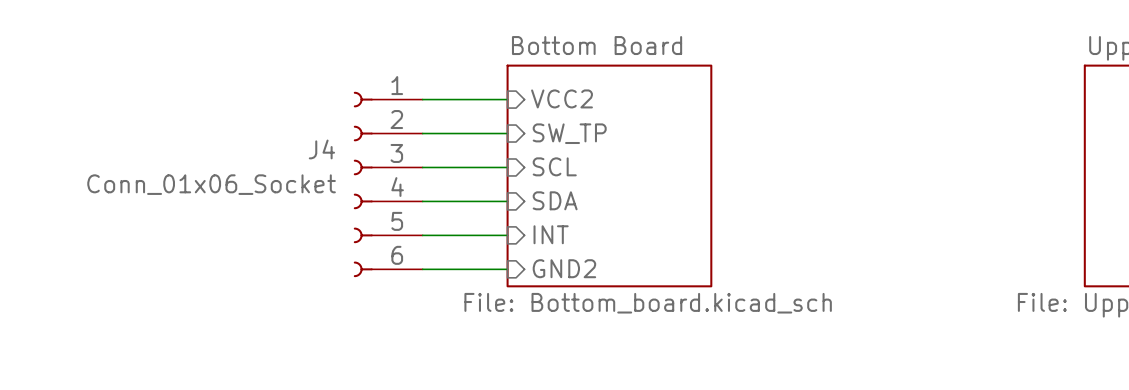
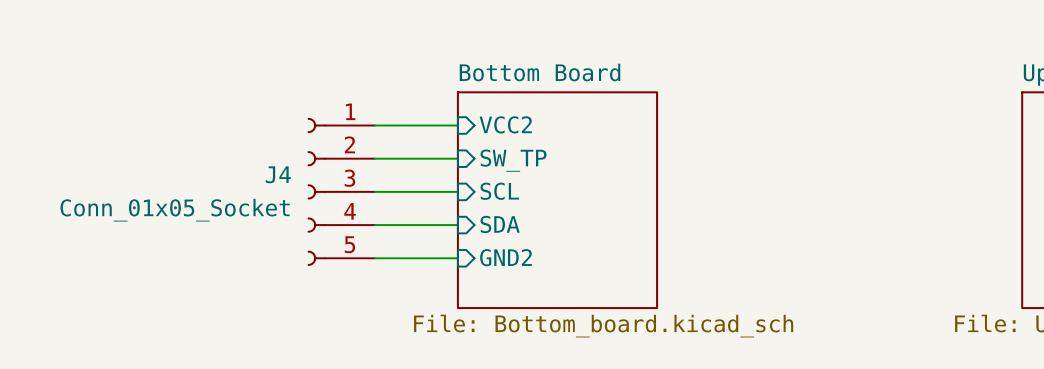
J4 symbol: [353, 91, 423, 278] -> [307, 117, 375, 266]
J4 value: Conn_01x06_Socket (211, 184) -> Conn_01x05_Socket (175, 210)
sheet pin: INT (551, 234) -> GND2 (506, 257)
sheet pin: GND2 (564, 268) -> none
wire: (422, 269) (507, 269) -> none

